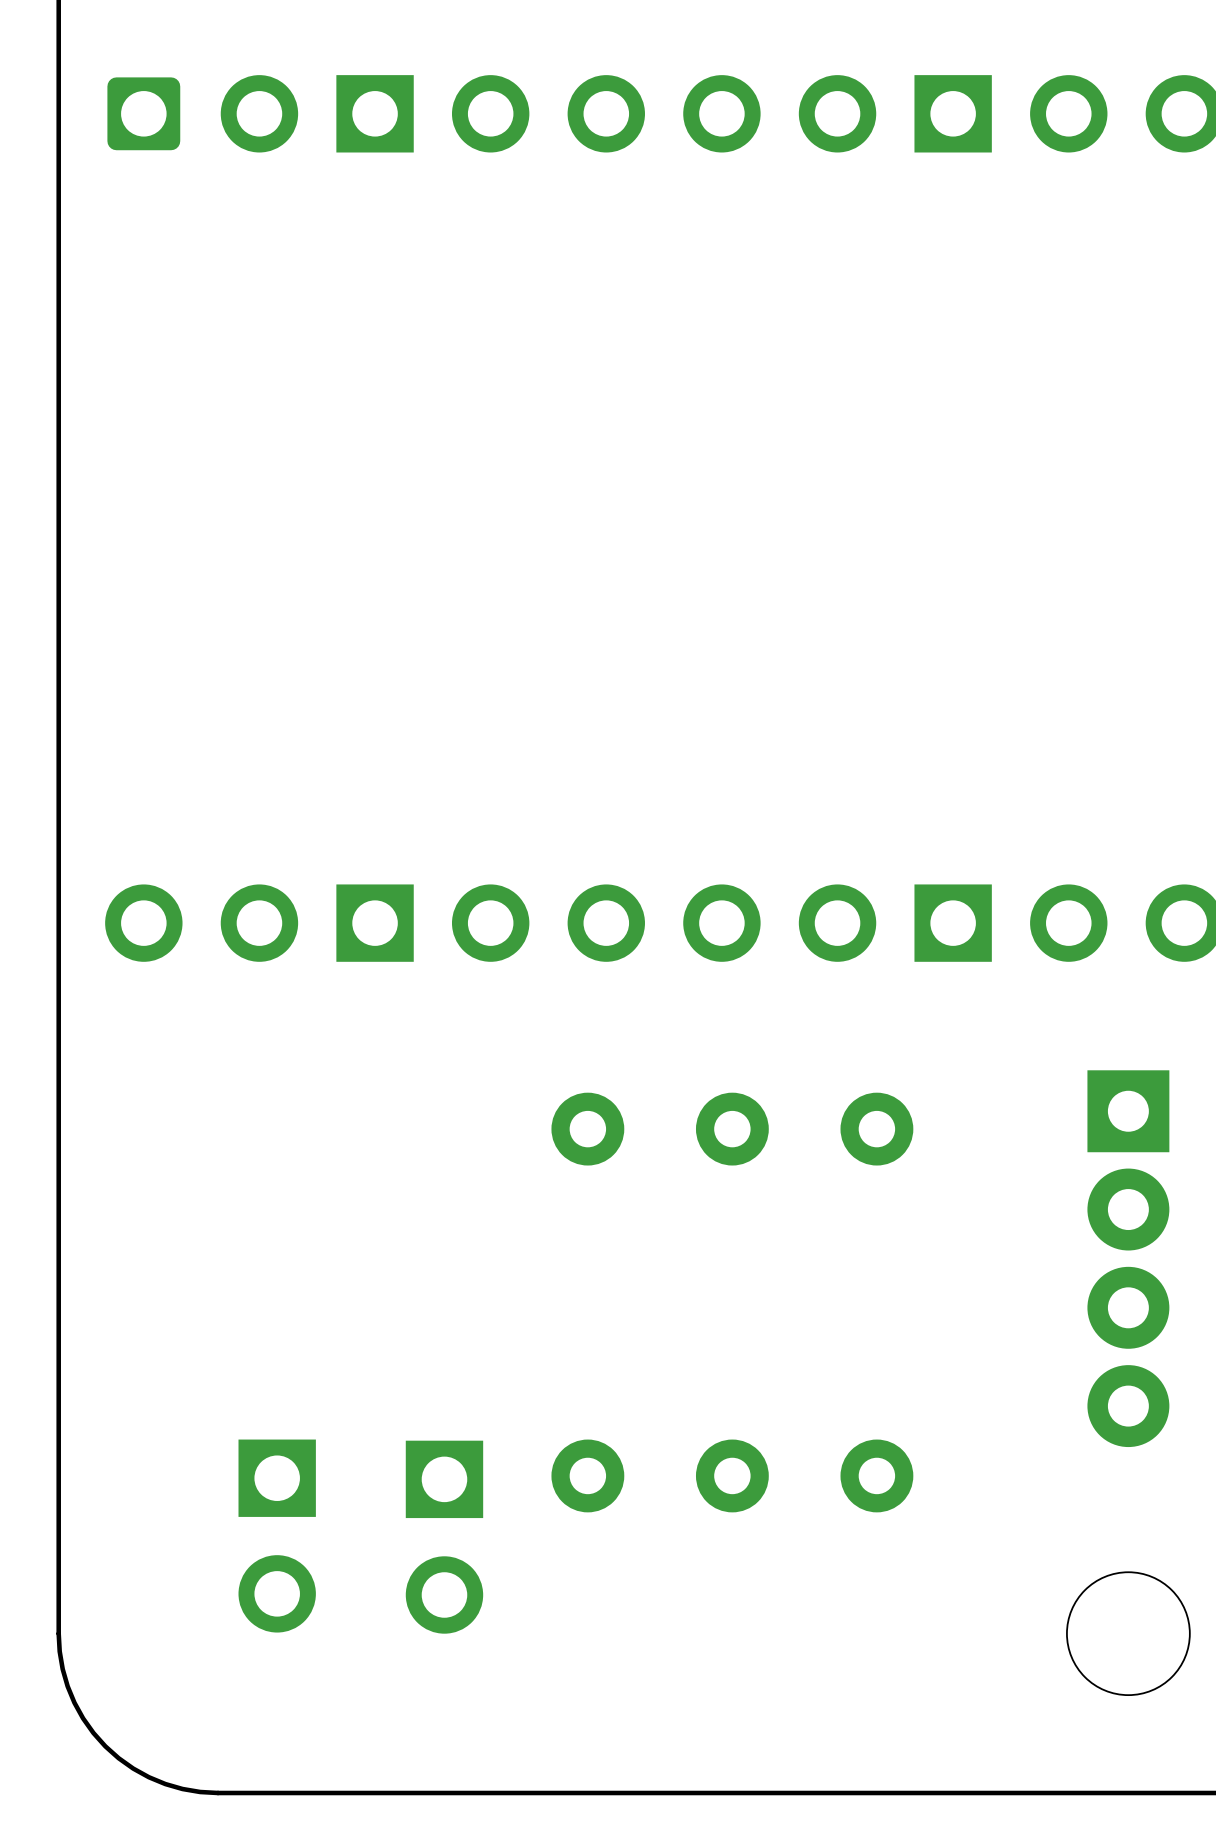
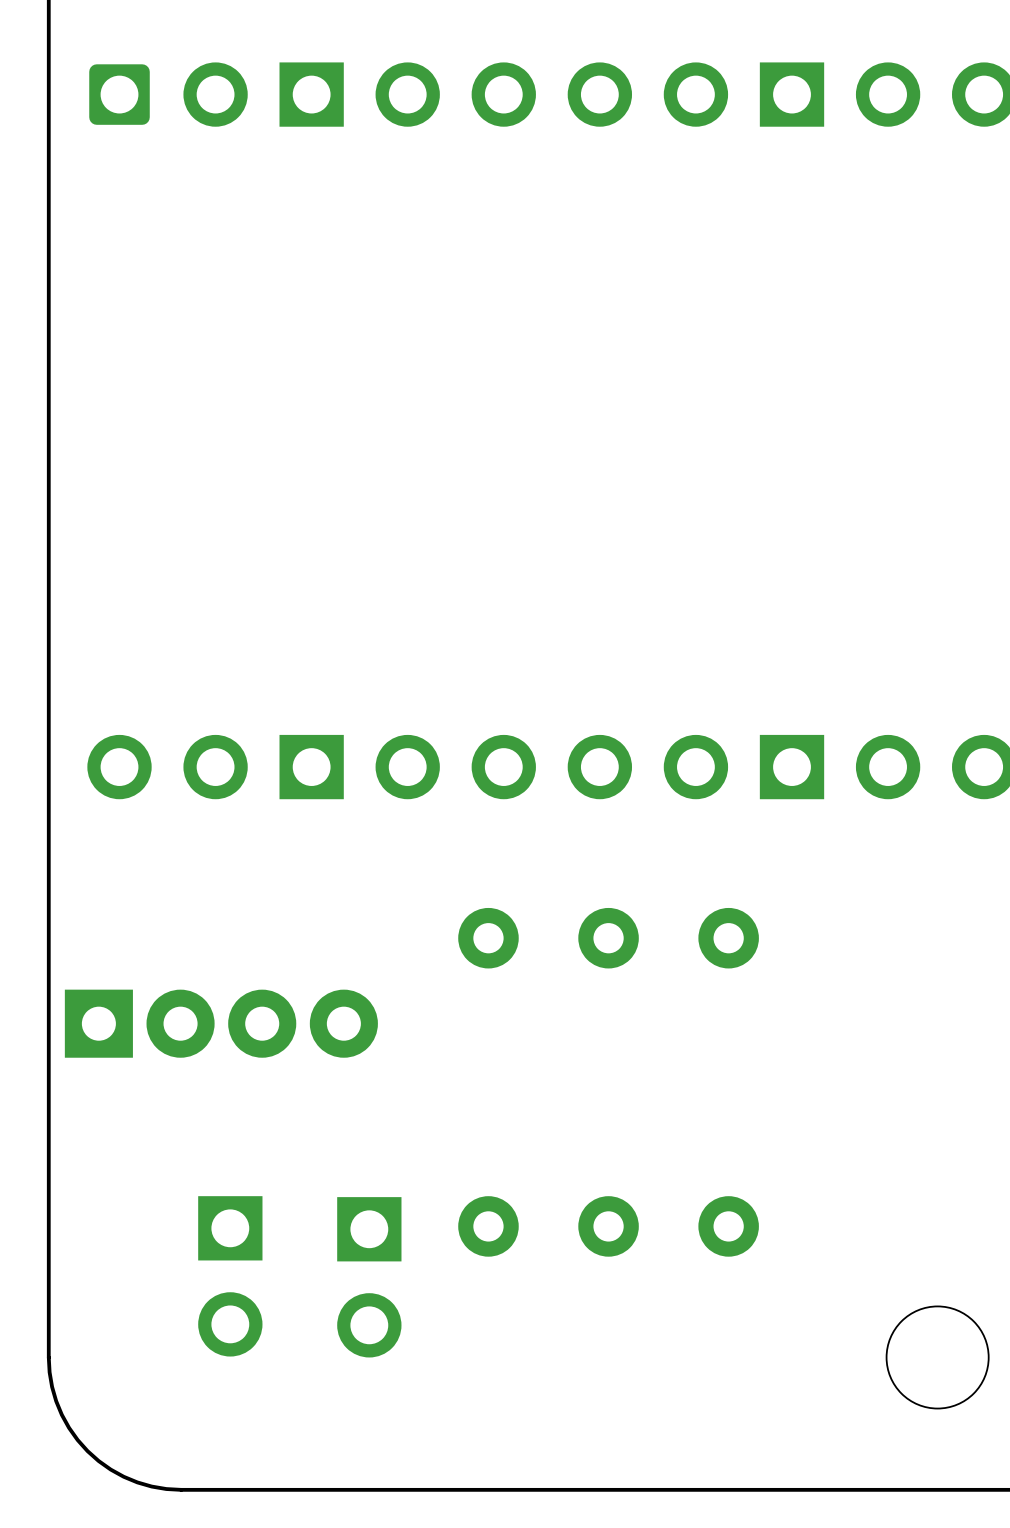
part rotation: 0° (1128, 1258) -> 90° counterclockwise (221, 1023)
part position: (1128, 1258) -> (221, 1023)

